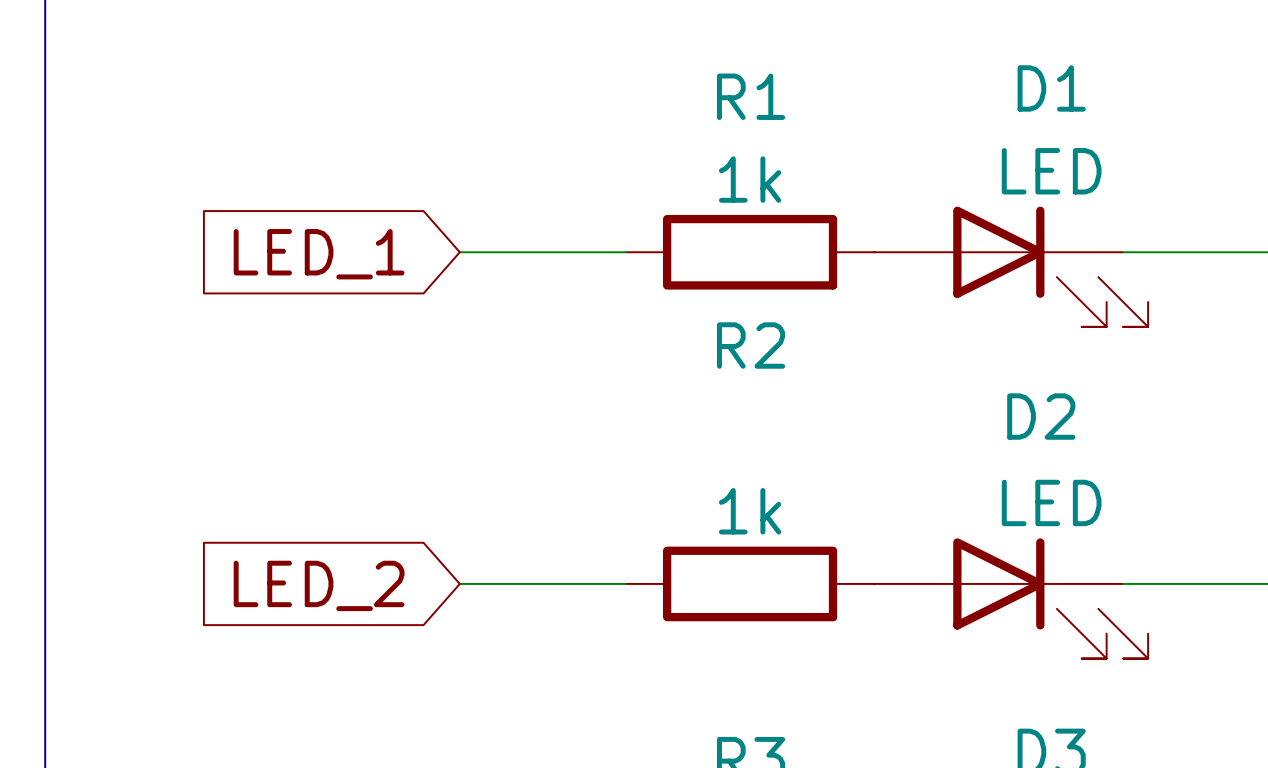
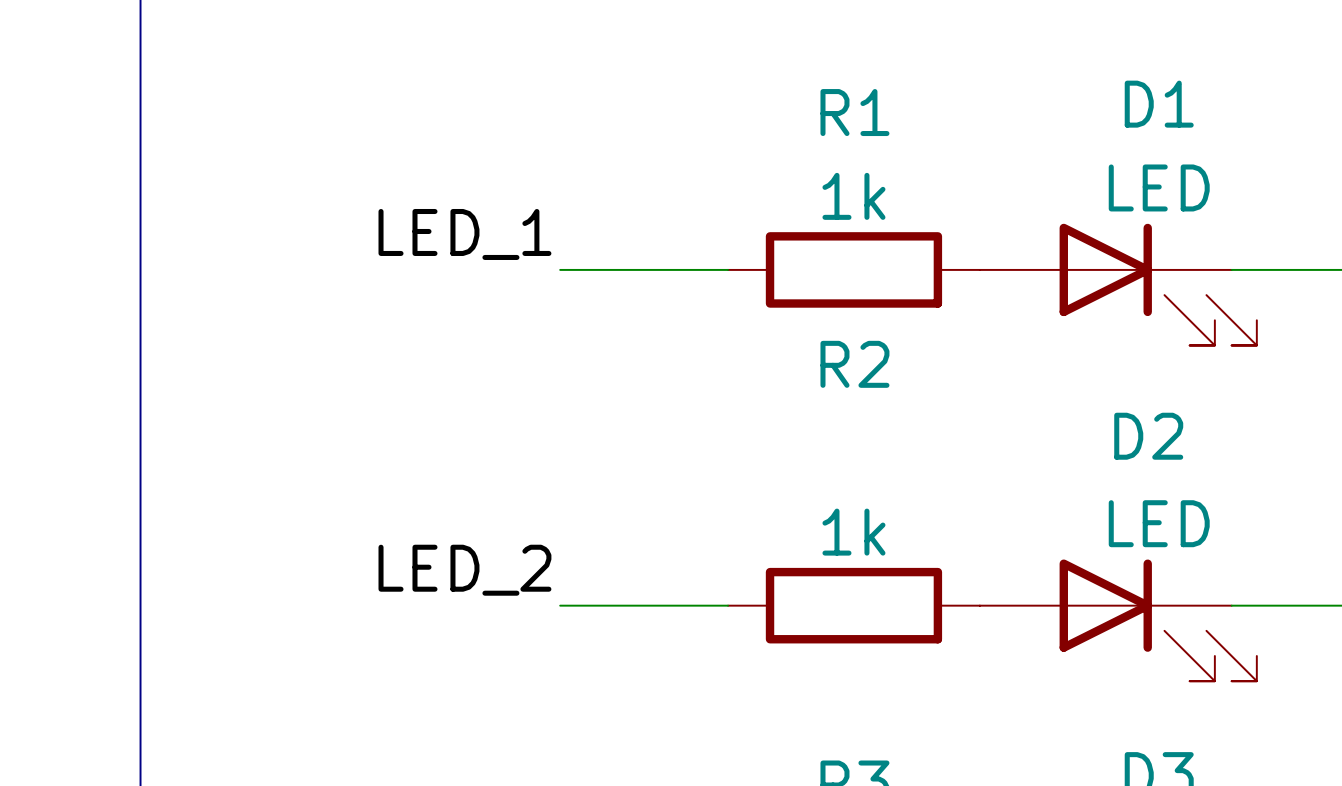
label: none -> LED_1 (464, 234)
global label: LED_1 (319, 254) -> none
label: none -> LED_2 (464, 570)
global label: LED_2 (319, 585) -> none

